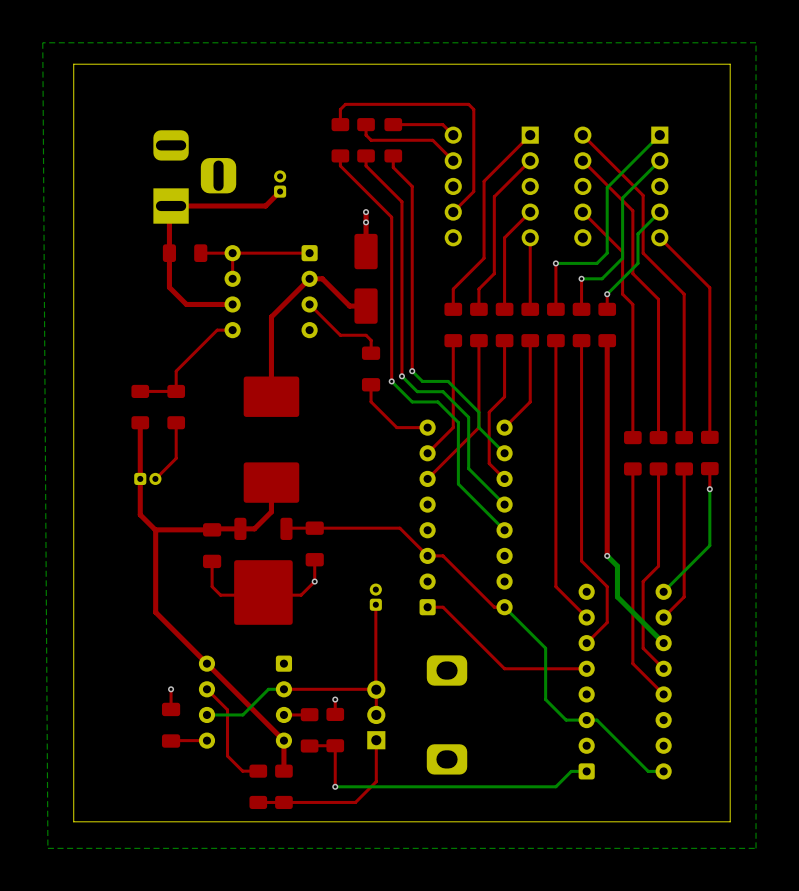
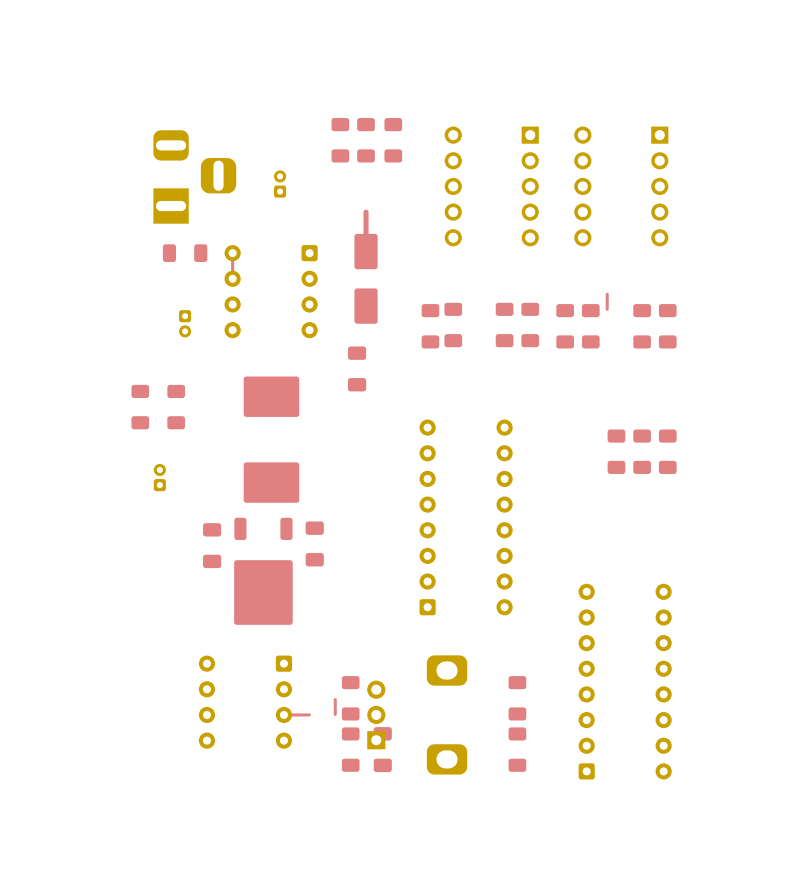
bottom zone outline: (756, 42) (42, 42) (47, 848) (756, 848) (756, 42) -> none
board edge: (730, 64) (73, 64) (73, 821) (730, 821) (730, 64) -> none
top track: (340, 124) (340, 109) (345, 104) (468, 104) (473, 109) (473, 191) (453, 212) -> none
top track: (366, 124) (366, 135) (371, 140) (432, 140) (453, 160) -> none
top track: (393, 124) (442, 124) (453, 135) -> none
top track: (530, 135) (484, 181) (484, 258) (453, 289) (453, 309) -> none
top track: (582, 135) (643, 195) (643, 253) (684, 294) (684, 437) -> none
bottom track: (659, 135) (607, 187) (607, 253) (596, 263) (555, 263) -> none
top track: (340, 155) (340, 165) (391, 217) (391, 381) -> none
top track: (366, 155) (366, 165) (401, 201) (401, 376) -> none
top track: (393, 155) (393, 167) (412, 186) (412, 371) -> none
top track: (530, 160) (494, 196) (494, 273) (478, 289) (478, 309) -> none
top track: (582, 160) (632, 210) (632, 273) (658, 299) (658, 437) -> none
bottom track: (659, 160) (622, 197) (622, 258) (602, 278) (581, 278) -> none
top track: (280, 191) (265, 206) (171, 206) -> none
top track: (171, 200) (169, 202) (169, 287) (186, 304) (232, 304) -> none
via: (366, 212) -> none
top track: (530, 212) (504, 237) (504, 309) -> none
top track: (582, 212) (622, 251) (622, 294) (632, 304) (632, 437) -> none
bottom track: (659, 212) (637, 233) (637, 263) (607, 294) -> none
via: (366, 222) -> none
top track: (525, 237) (530, 237) (530, 309) -> none
top track: (659, 237) (709, 287) (709, 437) -> none
top track: (309, 253) (200, 253) -> none
top track: (555, 263) (555, 309) -> none
via: (555, 263) -> none
top track: (581, 278) (581, 309) -> none
via: (581, 278) -> none
via: (607, 294) -> none
top track: (309, 304) (340, 335) (366, 335) (371, 340) (371, 353) -> none
top track: (366, 306) (349, 306) (322, 278) (309, 278) (271, 316) (271, 396) -> none
part: none -> (185, 323)
part: (478, 324) -> none
part: (555, 324) -> none
part: (581, 324) -> none
part: (607, 324) -> none
part: none -> (430, 326)
part: none -> (565, 326)
part: none -> (590, 326)
part: none -> (642, 326)
part: none -> (667, 326)
top track: (232, 330) (217, 330) (176, 371) (176, 391) (140, 391) -> none
top track: (453, 340) (453, 427) (427, 453) -> none
top track: (478, 340) (478, 427) (427, 478) -> none
top track: (504, 340) (504, 396) (489, 412) (489, 463) (504, 478) -> none
top track: (530, 340) (530, 401) (504, 427) -> none
top track: (555, 340) (555, 586) (586, 617) -> none
top track: (581, 340) (581, 561) (607, 586) (607, 622) (586, 643) -> none
top track: (607, 340) (607, 555) -> none
part position: (371, 368) -> (357, 368)
bottom track: (412, 371) (422, 381) (448, 381) (478, 412) (478, 427) (504, 453) -> none
via: (412, 371) -> none
bottom track: (401, 376) (417, 391) (443, 391) (468, 417) (468, 468) (504, 504) -> none
via: (401, 376) -> none
bottom track: (391, 381) (412, 401) (437, 401) (458, 422) (458, 484) (504, 530) -> none
via: (391, 381) -> none
top track: (371, 384) (371, 401) (396, 427) (427, 427) -> none
top track: (140, 422) (140, 514) (155, 530) (155, 612) (283, 740) -> none
top track: (176, 422) (176, 458) (155, 478) -> none
part: none -> (616, 451)
part: none -> (642, 451)
part: none -> (667, 451)
part: (632, 453) -> none
part: (658, 453) -> none
part: (684, 453) -> none
part: (709, 453) -> none
top track: (632, 468) (632, 663) (663, 694) -> none
top track: (658, 468) (658, 566) (643, 581) (643, 648) (663, 668) -> none
top track: (684, 468) (684, 596) (663, 617) -> none
top track: (709, 468) (709, 489) -> none
part rotation: 0° (147, 478) -> 90° counterclockwise (159, 477)
top track: (271, 482) (271, 511) (254, 528) (155, 529) -> none
bottom track: (709, 489) (709, 545) (663, 591) -> none
via: (709, 489) -> none
top track: (287, 528) (399, 528) (427, 555) (443, 555) (494, 607) (504, 607) -> none
bottom track: (607, 555) (617, 566) (617, 596) (663, 643) -> none
via: (607, 555) -> none
top track: (314, 559) (314, 581) (301, 595) (220, 595) (212, 586) (212, 561) -> none
via: (314, 581) -> none
part: (375, 597) -> none
top track: (375, 604) (376, 714) -> none
top track: (427, 607) (443, 607) (504, 668) (586, 668) -> none
bottom track: (504, 607) (545, 648) (545, 699) (566, 720) (596, 720) (648, 771) (663, 771) -> none
top track: (171, 689) (171, 709) -> none
via: (171, 689) -> none
top track: (206, 689) (227, 709) (227, 756) (242, 771) (258, 771) -> none
bottom track: (283, 689) (268, 689) (242, 714) (204, 714) -> none
top track: (375, 689) (283, 689) -> none
part: none -> (350, 698)
part: none -> (517, 698)
via: (335, 699) -> none
part: (171, 725) -> none
part: (309, 730) -> none
part: (335, 730) -> none
top track: (206, 740) (171, 741) -> none
top track: (283, 740) (283, 771) -> none
top track: (376, 740) (376, 781) (355, 802) (258, 802) -> none
top track: (309, 746) (335, 745) (335, 786) -> none
part: none -> (350, 749)
part: none -> (382, 749)
part: none -> (517, 749)
bottom track: (586, 771) (571, 771) (555, 786) (335, 786) -> none
part: (258, 786) -> none
part: (283, 786) -> none
via: (335, 786) -> none

